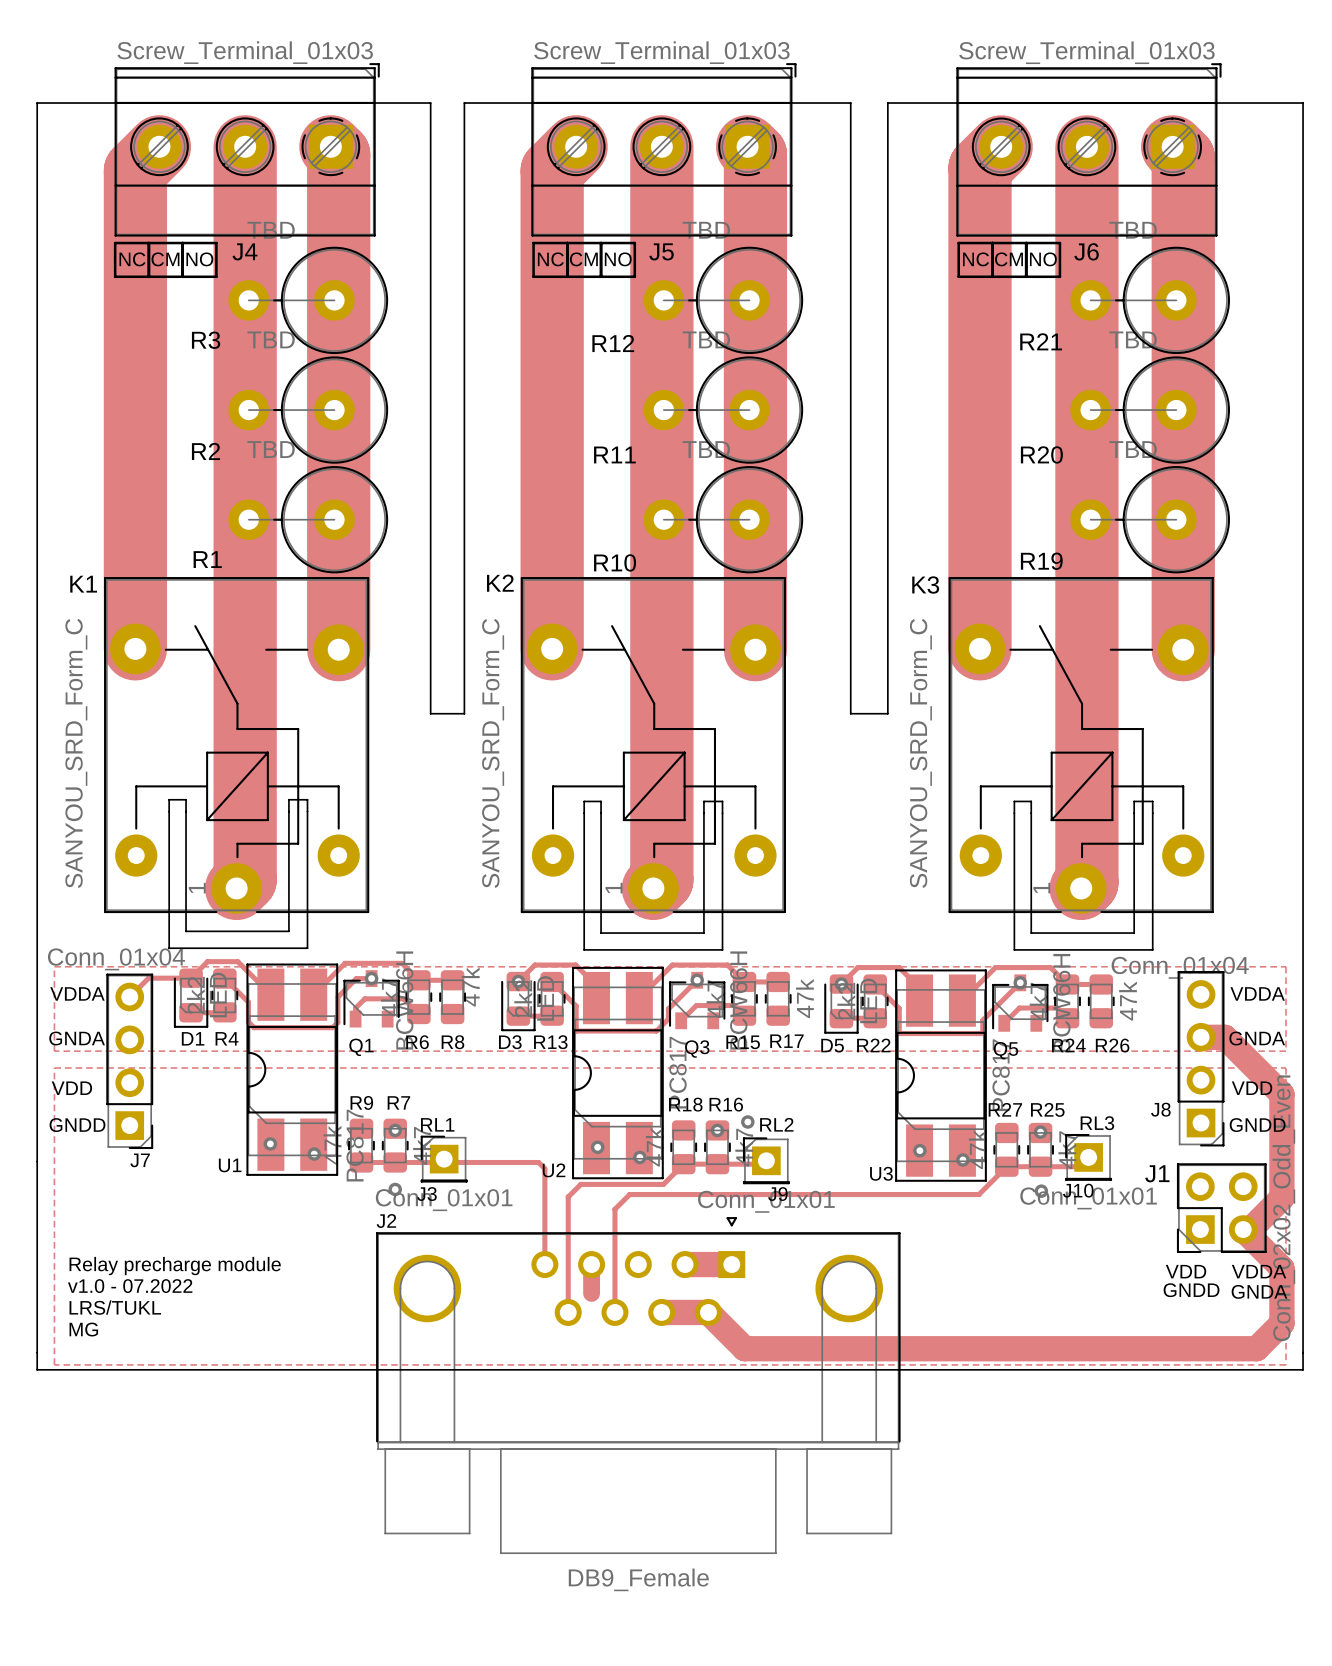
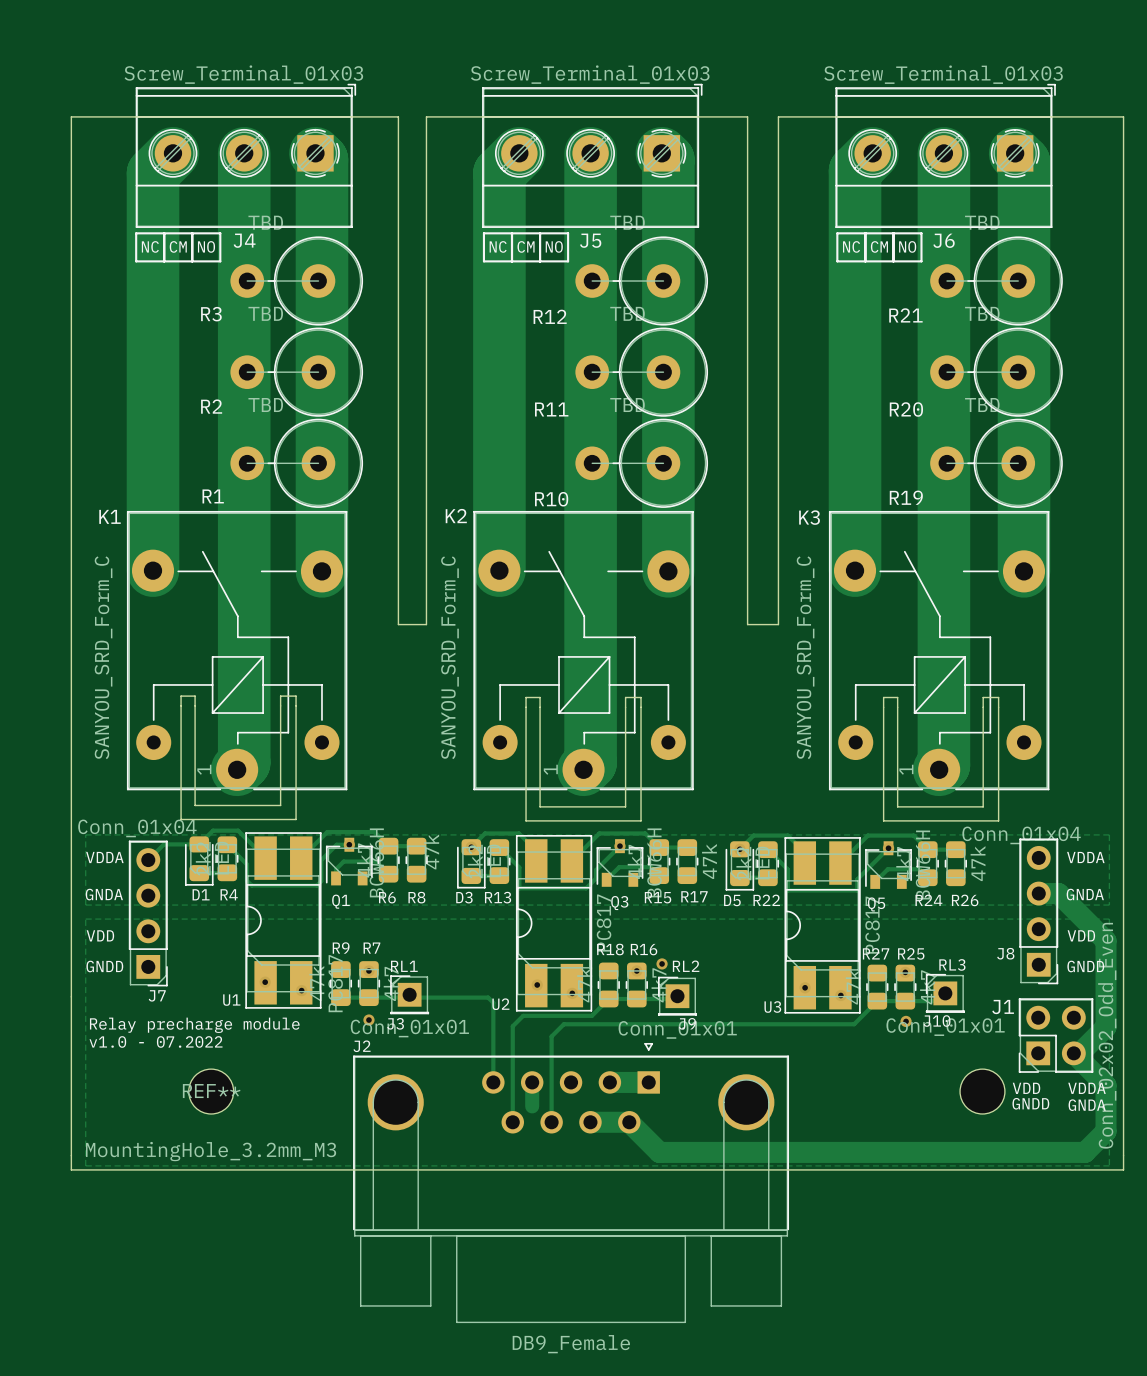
text position: Relay precharge module (175, 1266) -> Relay precharge module (194, 1025)
REF**: none -> MountingHole_3.2mm_M3 (211, 1091)
part: none -> (982, 1091)
text position: v1.0 - 07.2022 (130, 1286) -> v1.0 - 07.2022 (156, 1041)
text: LRS/TUKL (115, 1307) -> none
text: MG (83, 1329) -> none

